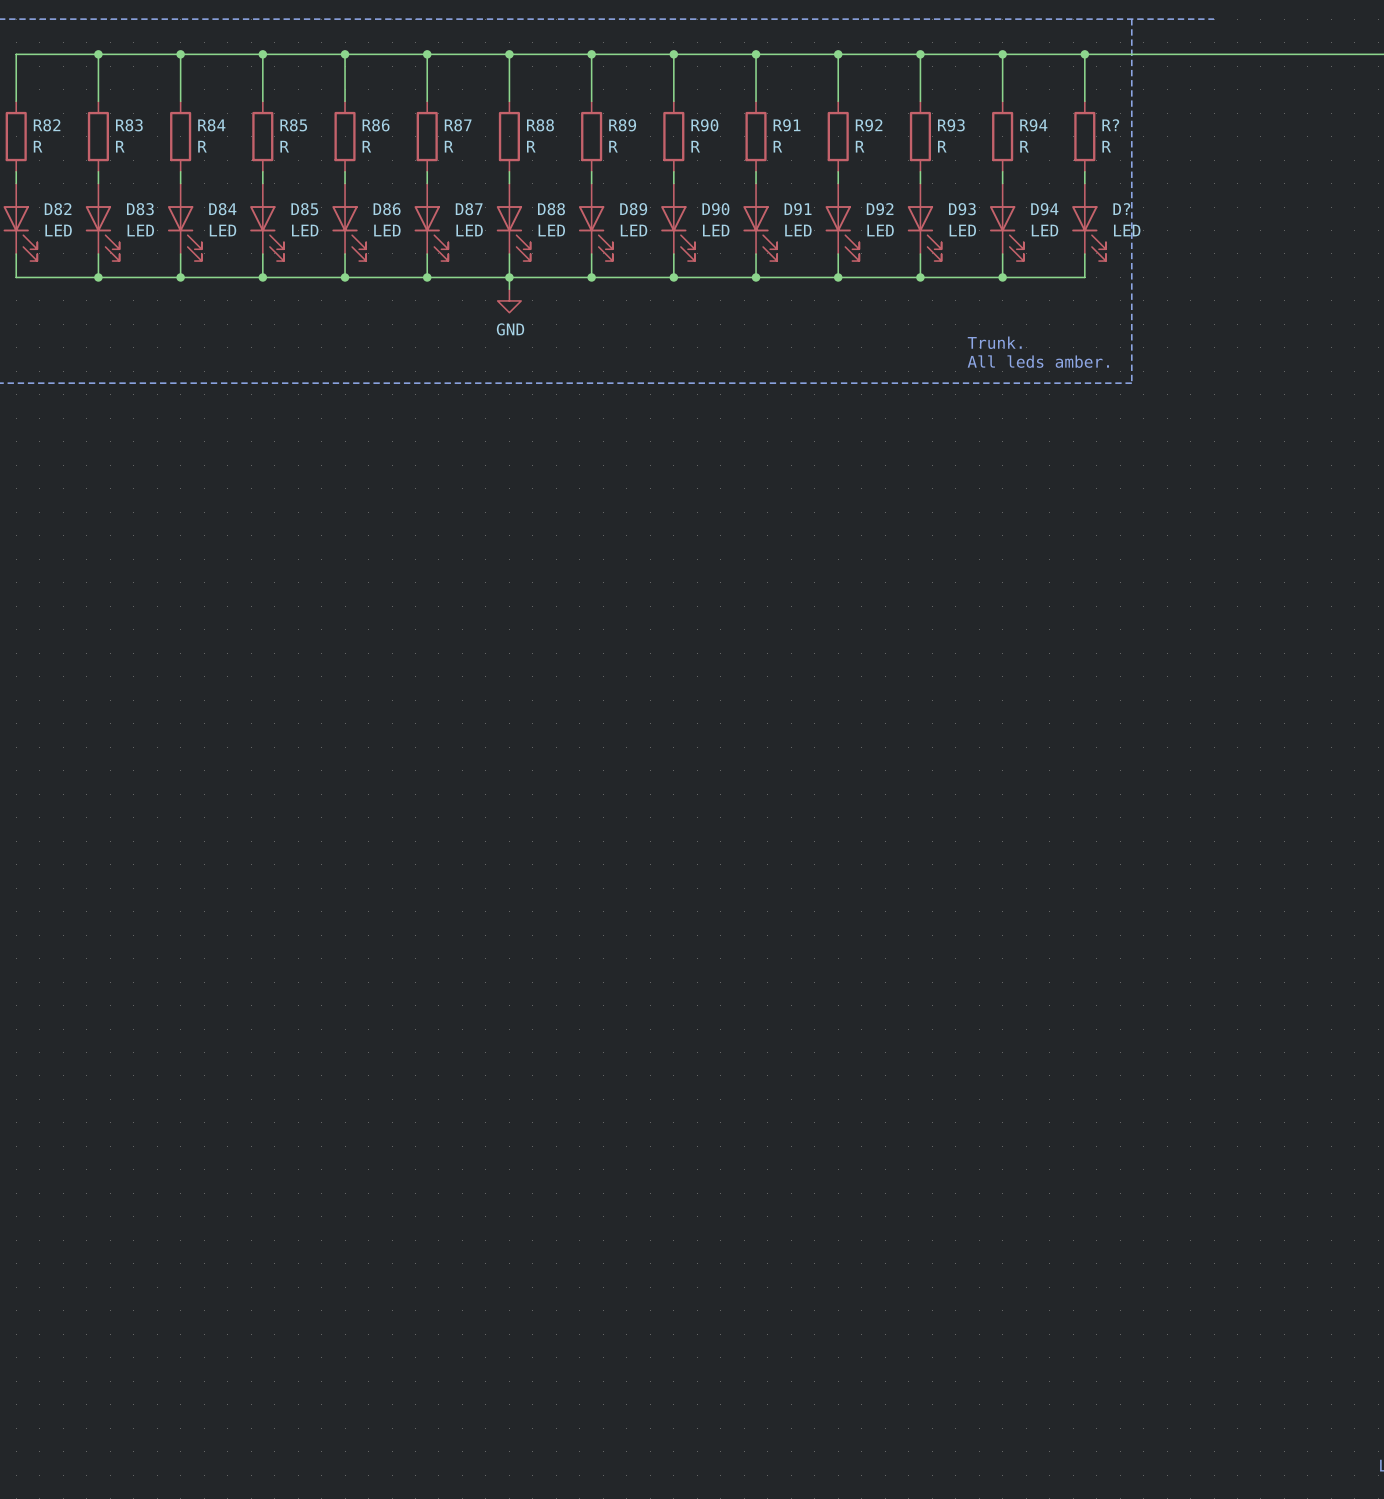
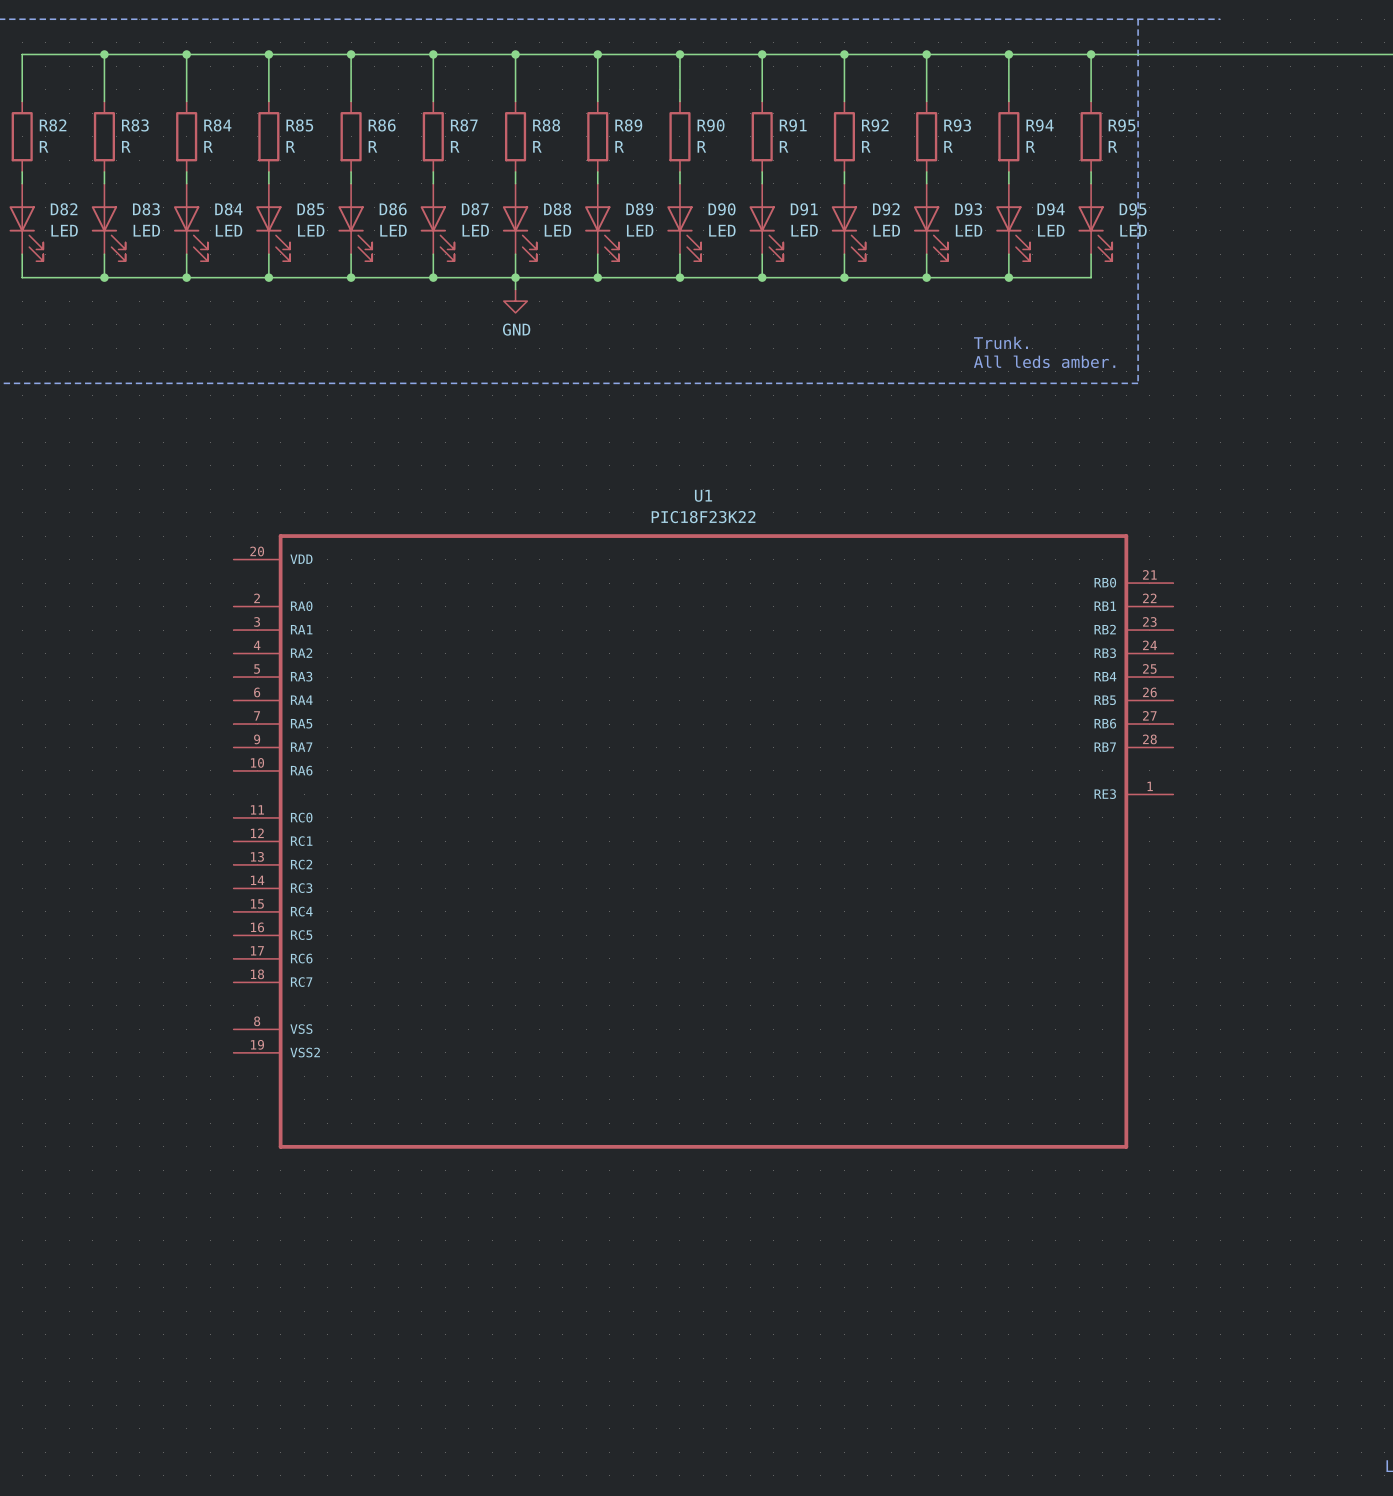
R? name: R? (1110, 125) -> R95 (1122, 125)
D? name: D? (1121, 209) -> D95 (1133, 209)
U1: none -> PIC18F23K22 (703, 841)

